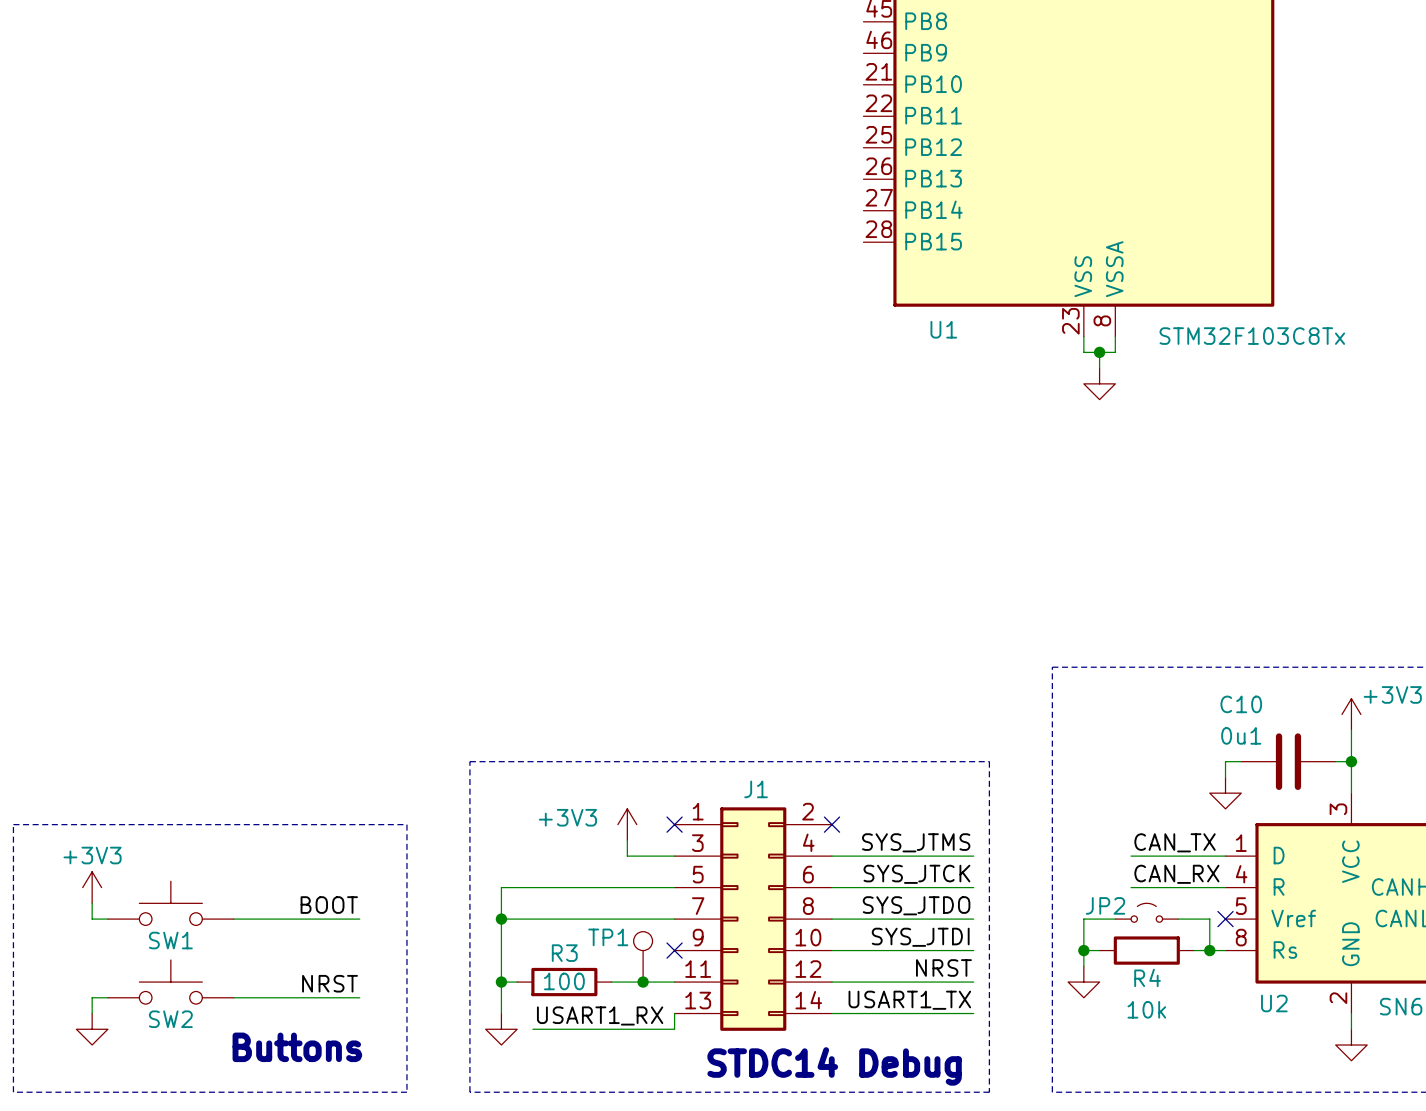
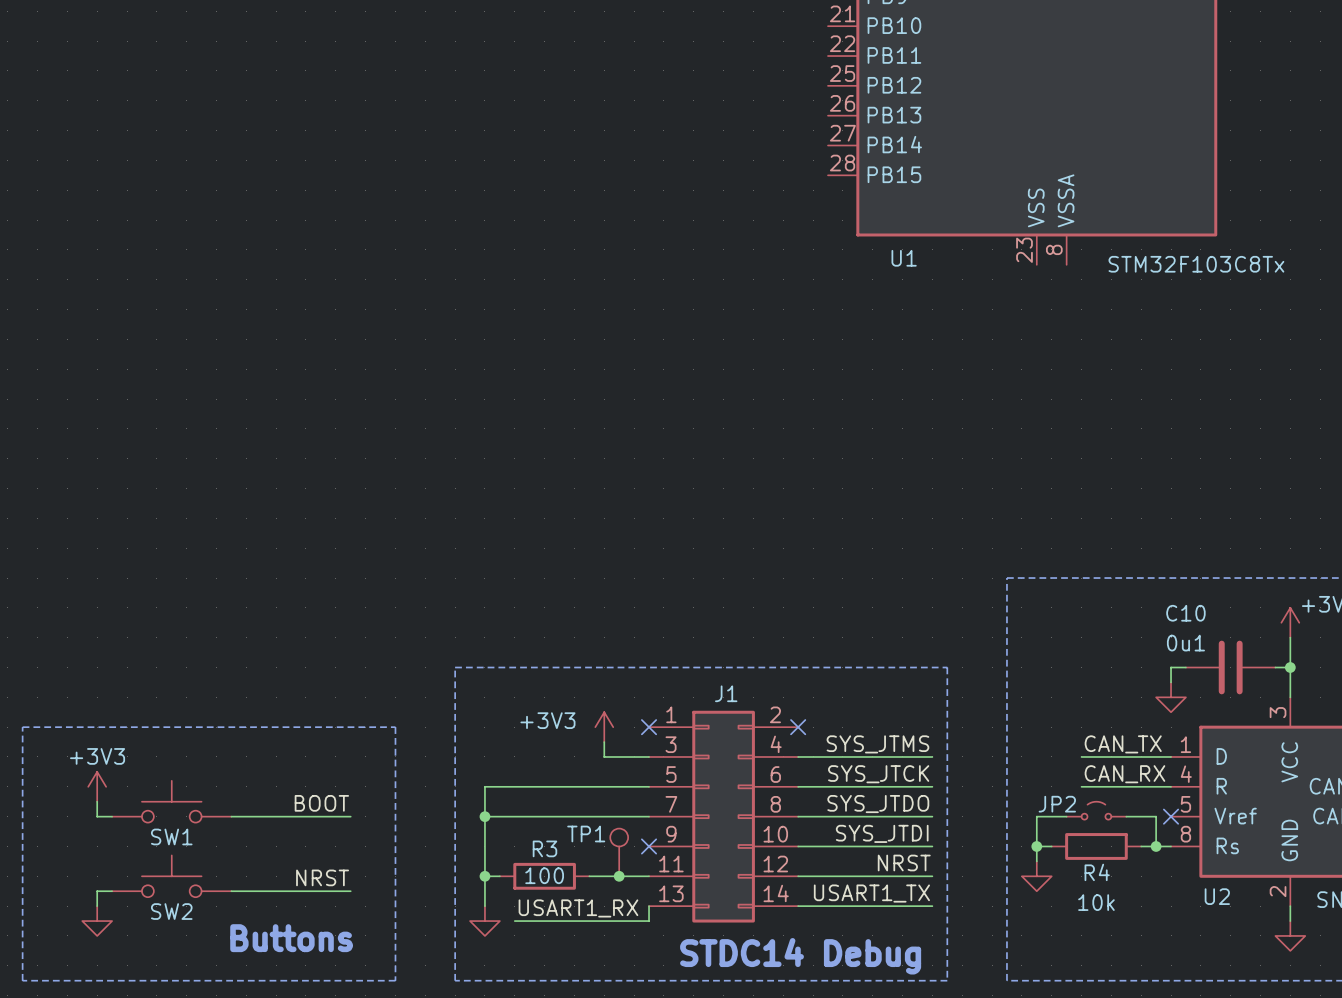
wire: (1083, 336) (1083, 352) (1115, 352) (1115, 336) -> none
wire: (1099, 352) (1099, 368) -> none
junction: (1099, 352) -> none
power symbol: (1099, 383) -> none

